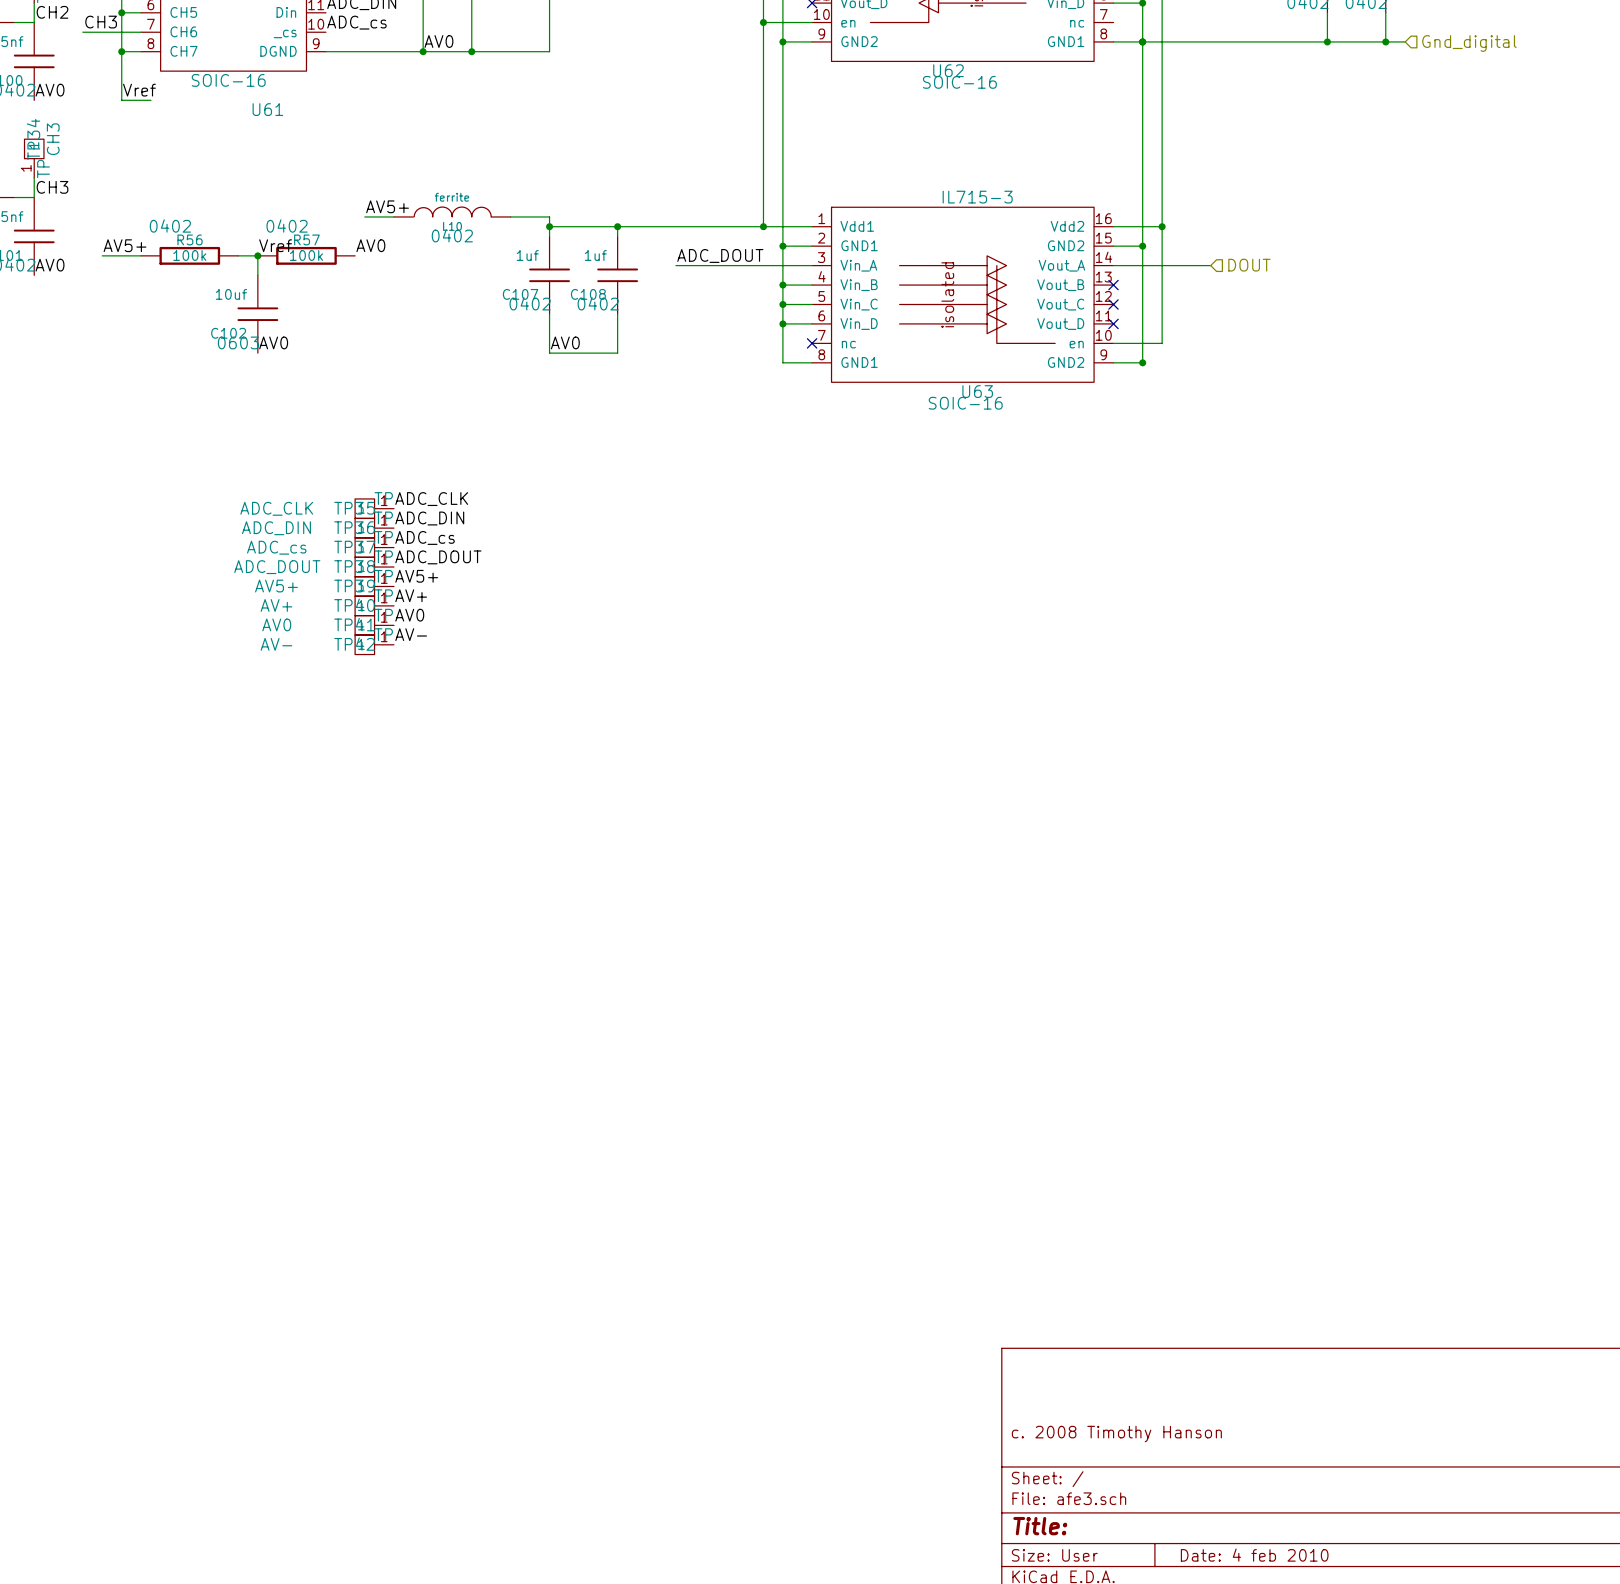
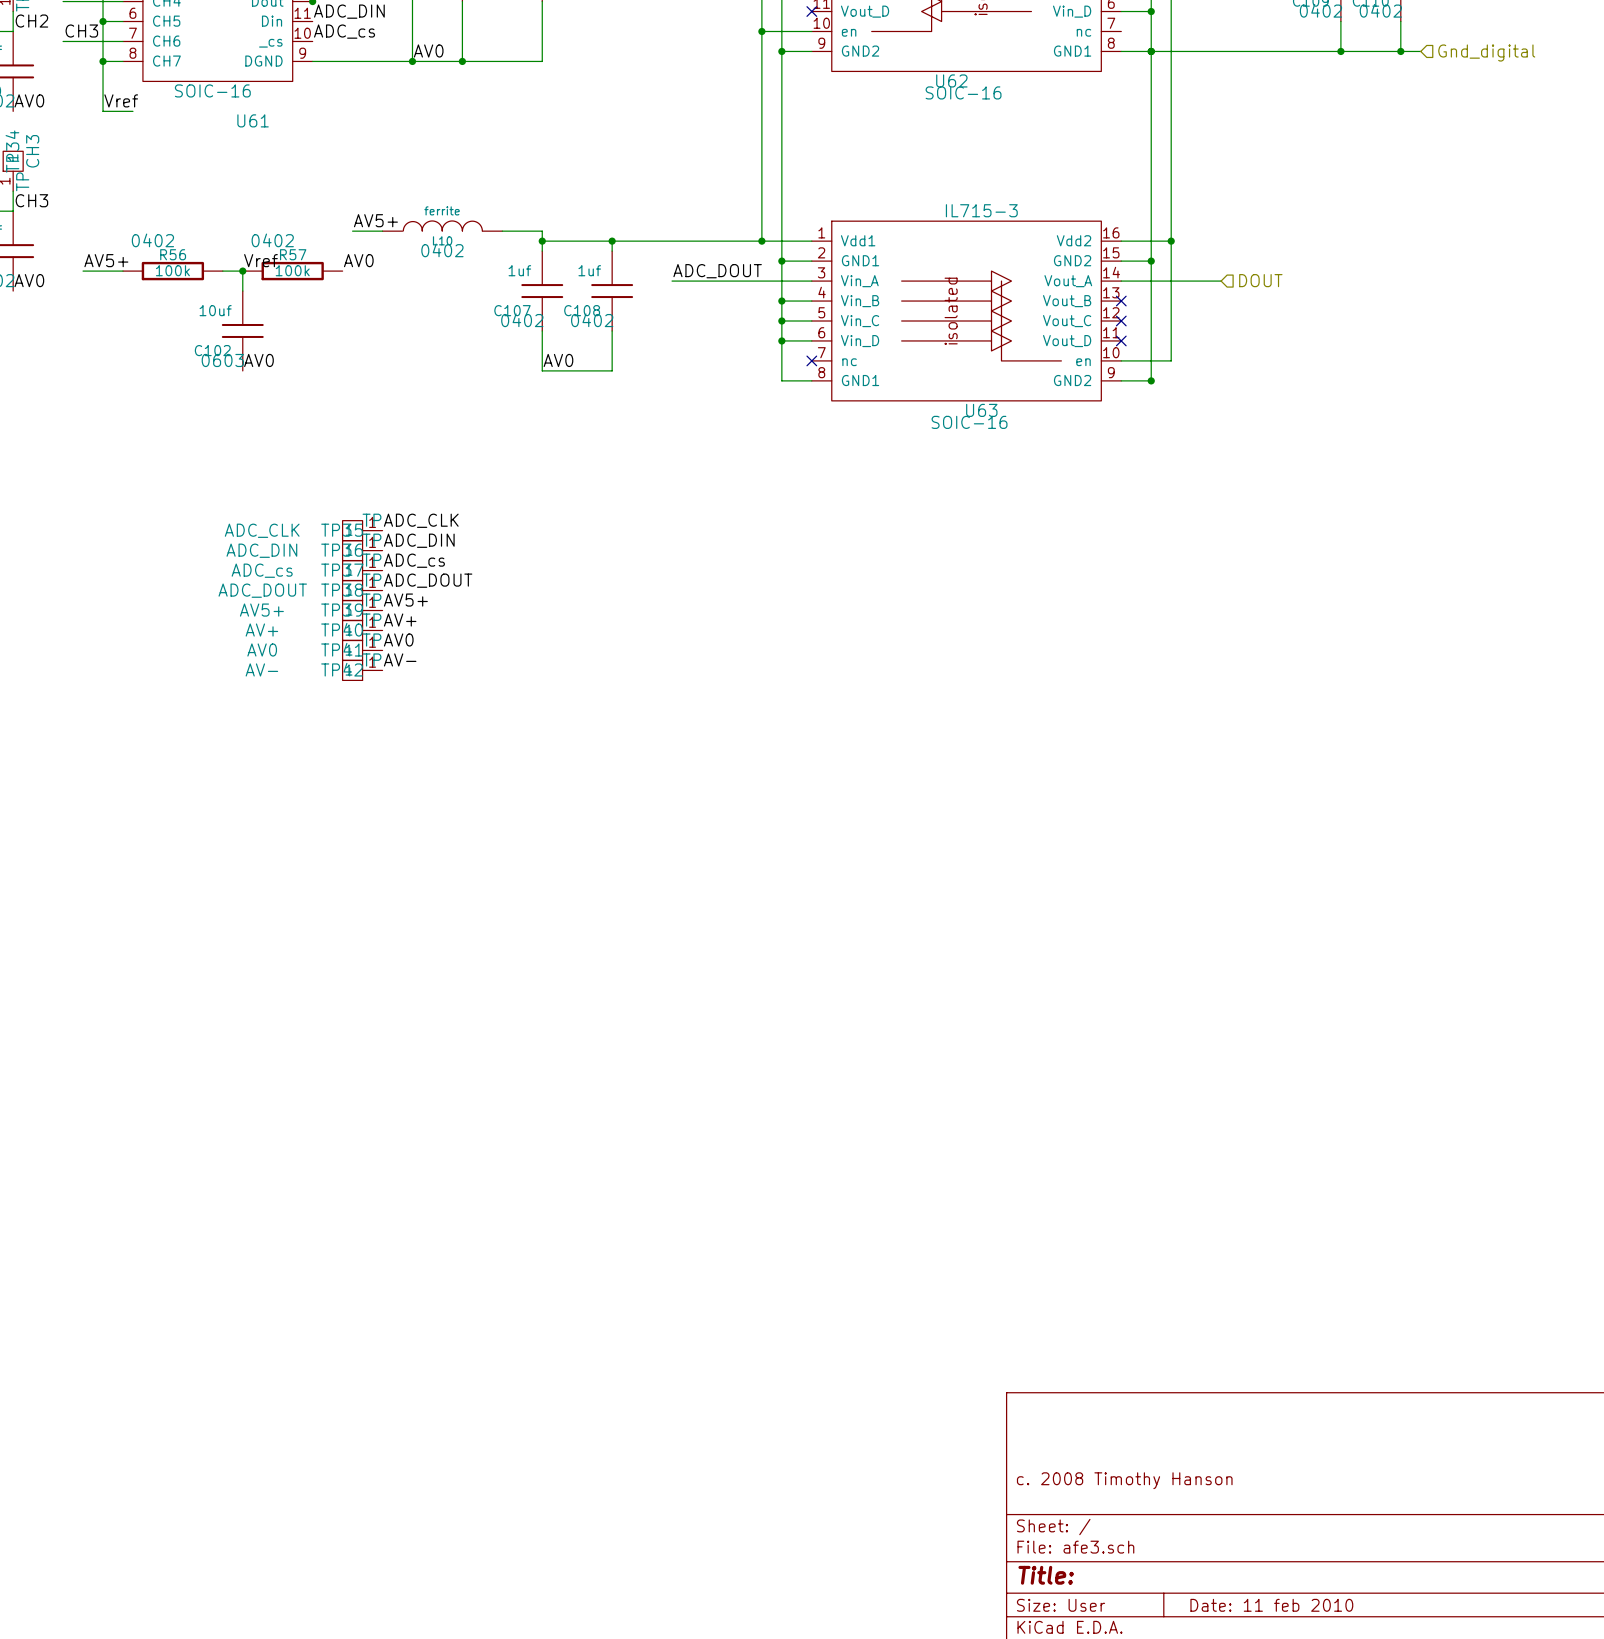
title block: Date: 4 feb 2010 (1254, 1555) -> Date: 11 feb 2010 (1271, 1605)

